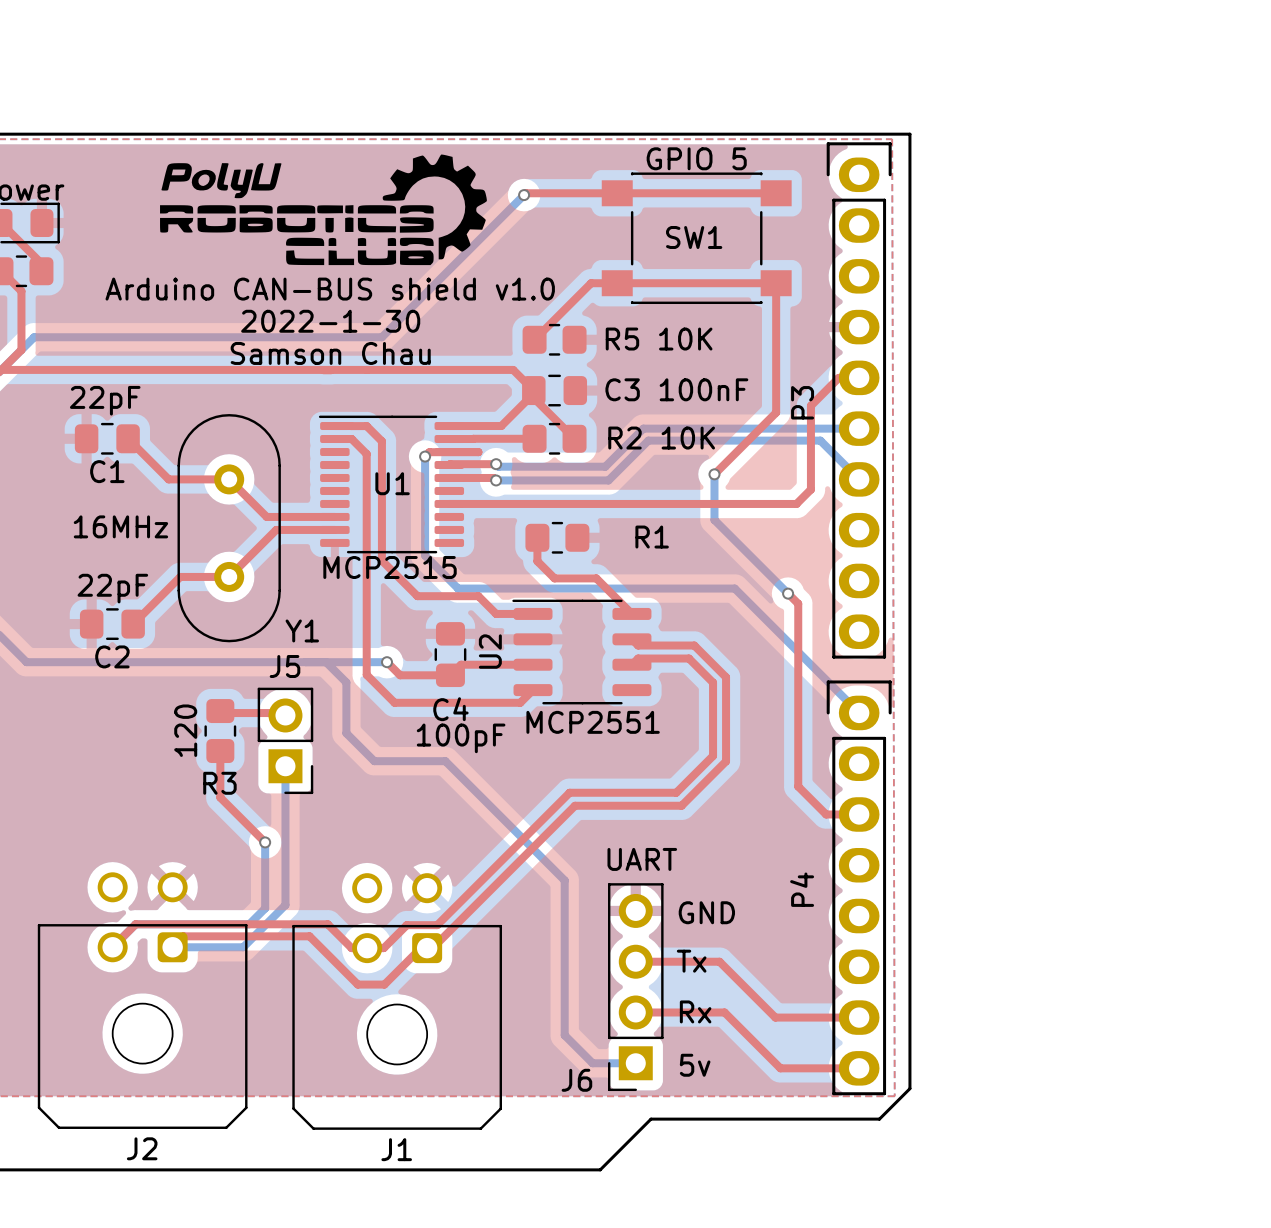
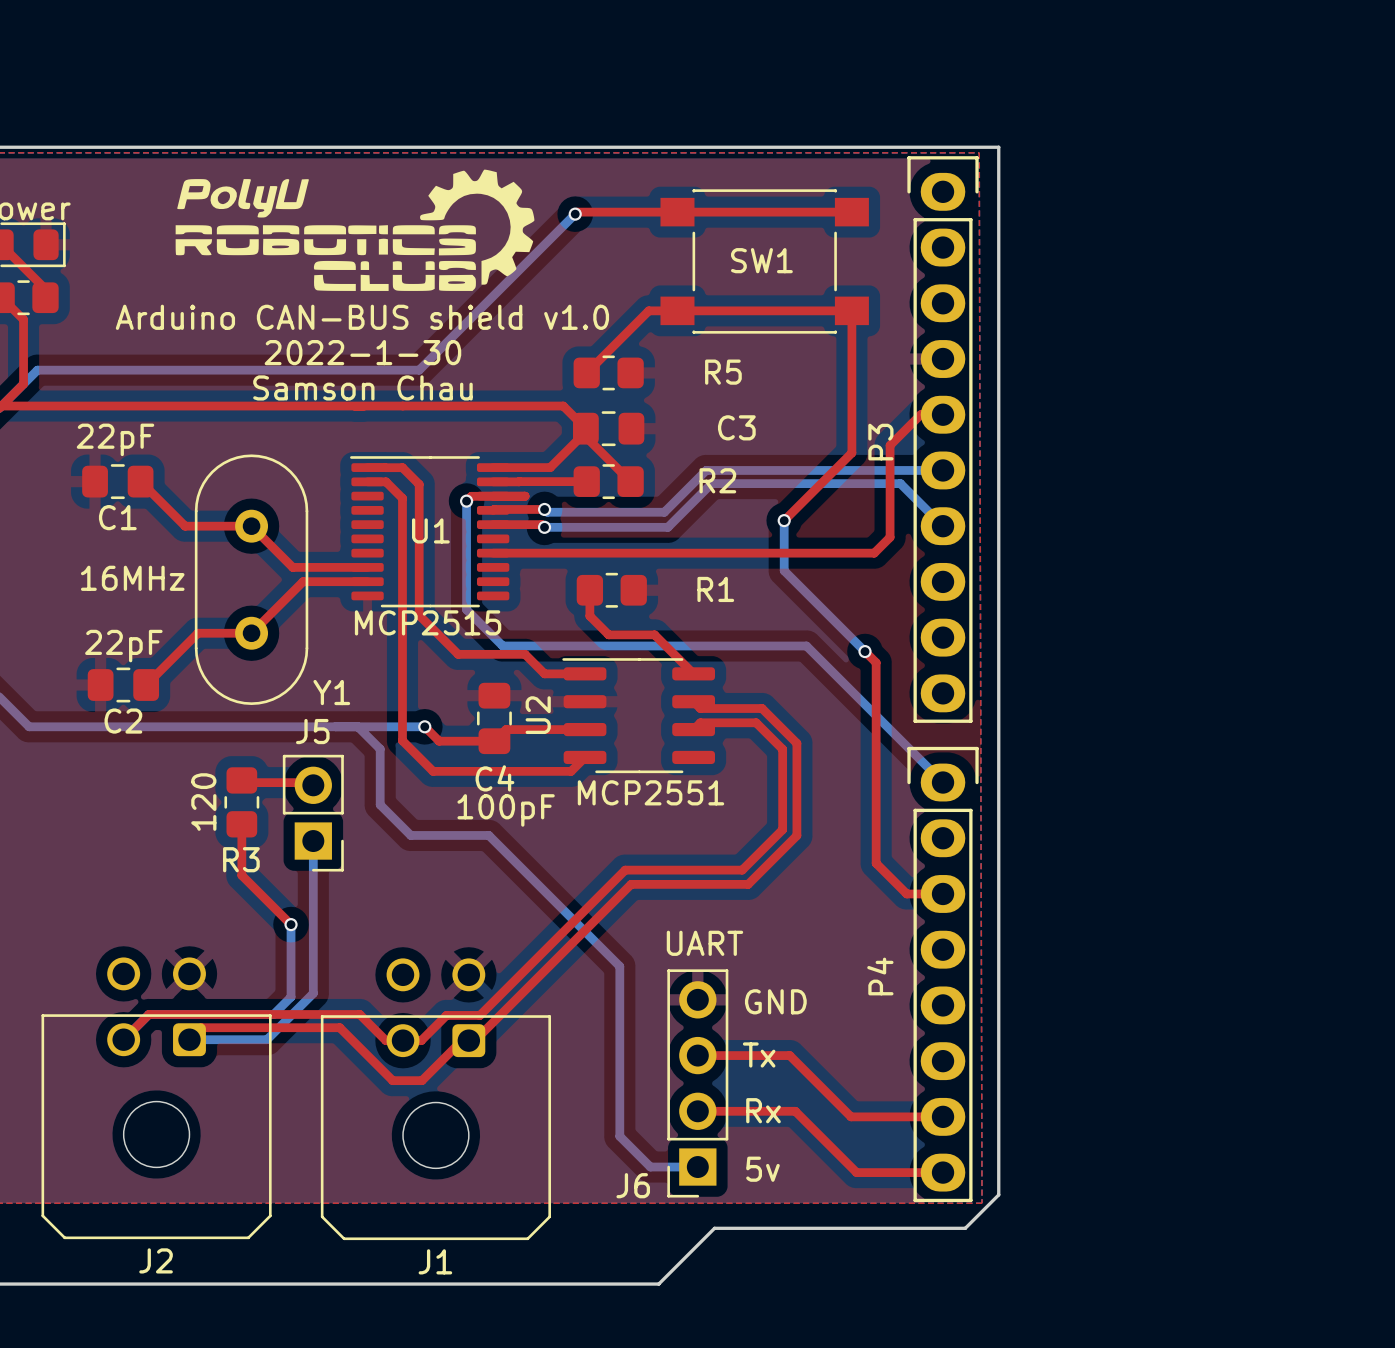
text: GPIO 5 (696, 158) -> none
R5 10K name: R5 10K (659, 339) -> R5 (723, 372)
C3 100nF name: C3 100nF (676, 389) -> C3 (736, 427)
R2 10K name: R2 10K (661, 438) -> R2 (717, 480)

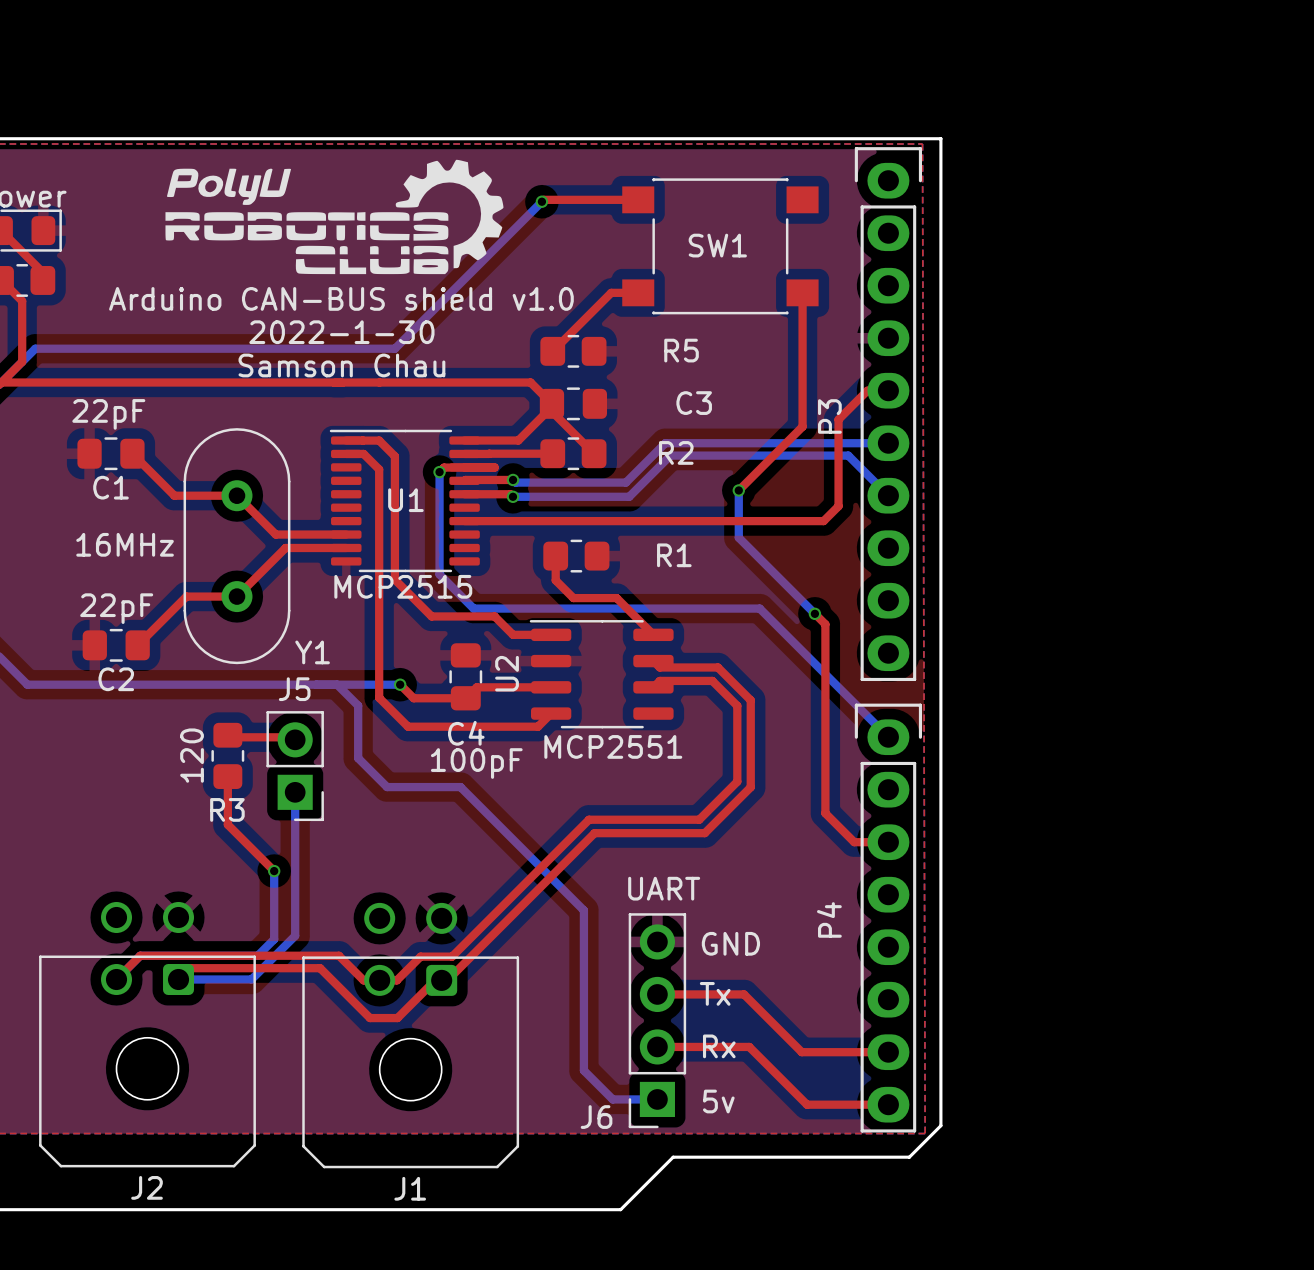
top track: (677, 212) (851, 212) -> none
top track: (677, 310) (851, 310) -> none

